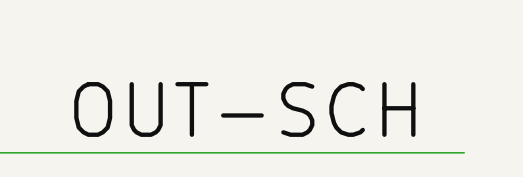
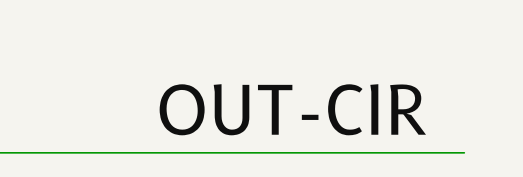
label: OUT-SCH (244, 109) -> OUT-CIR (292, 109)

